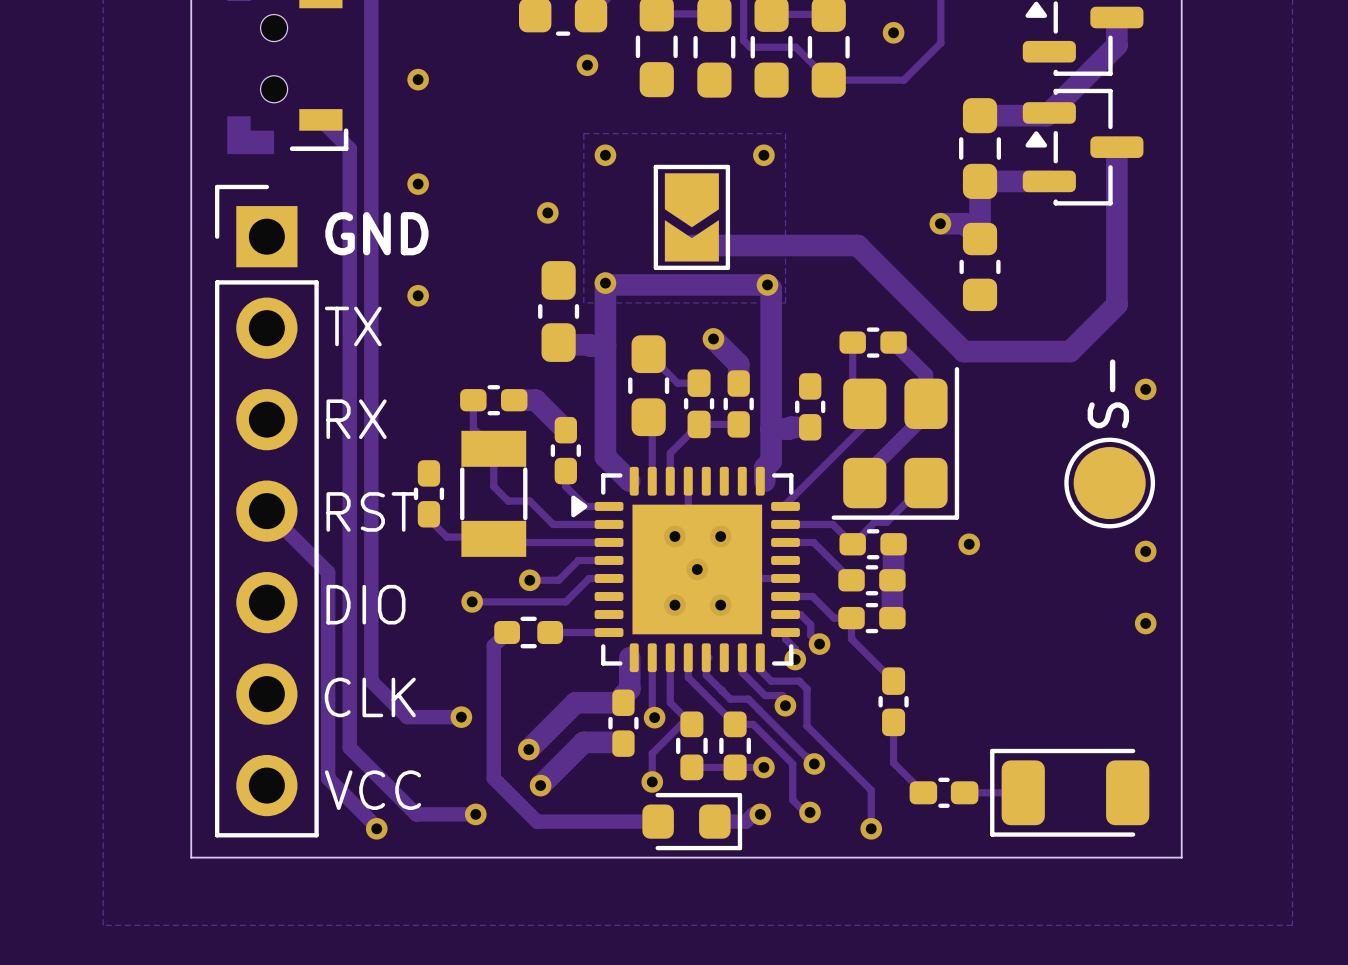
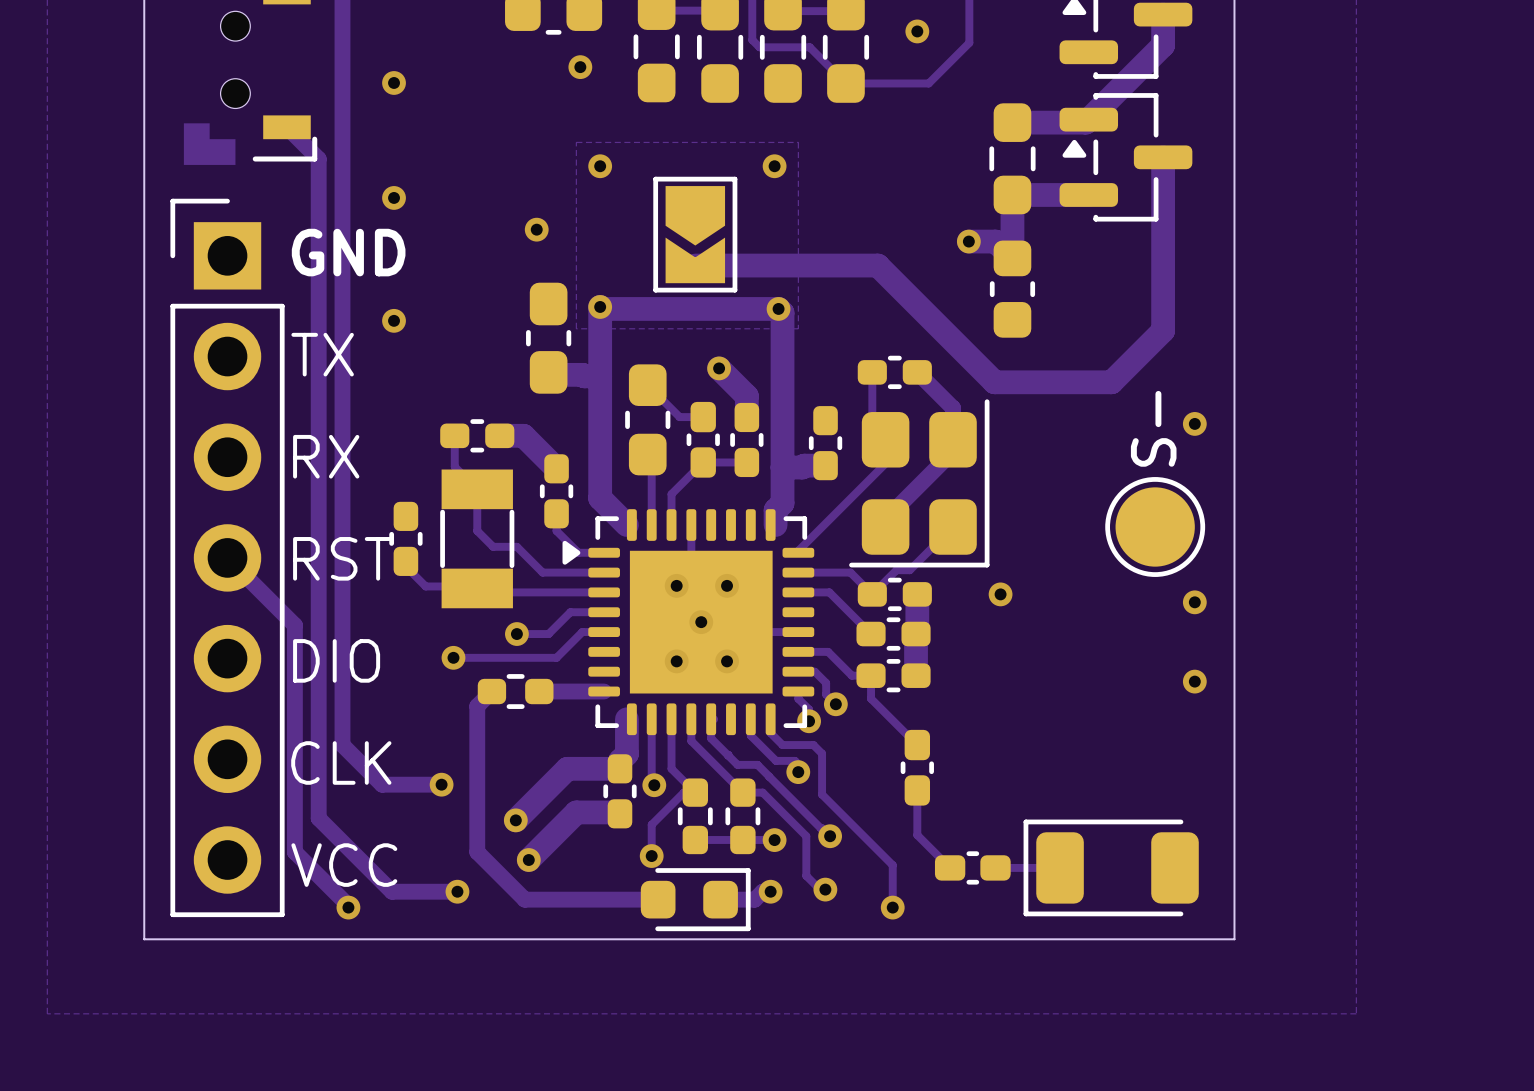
track width: thin (550, 632) (609, 632) -> thick (539, 691) (604, 691)

